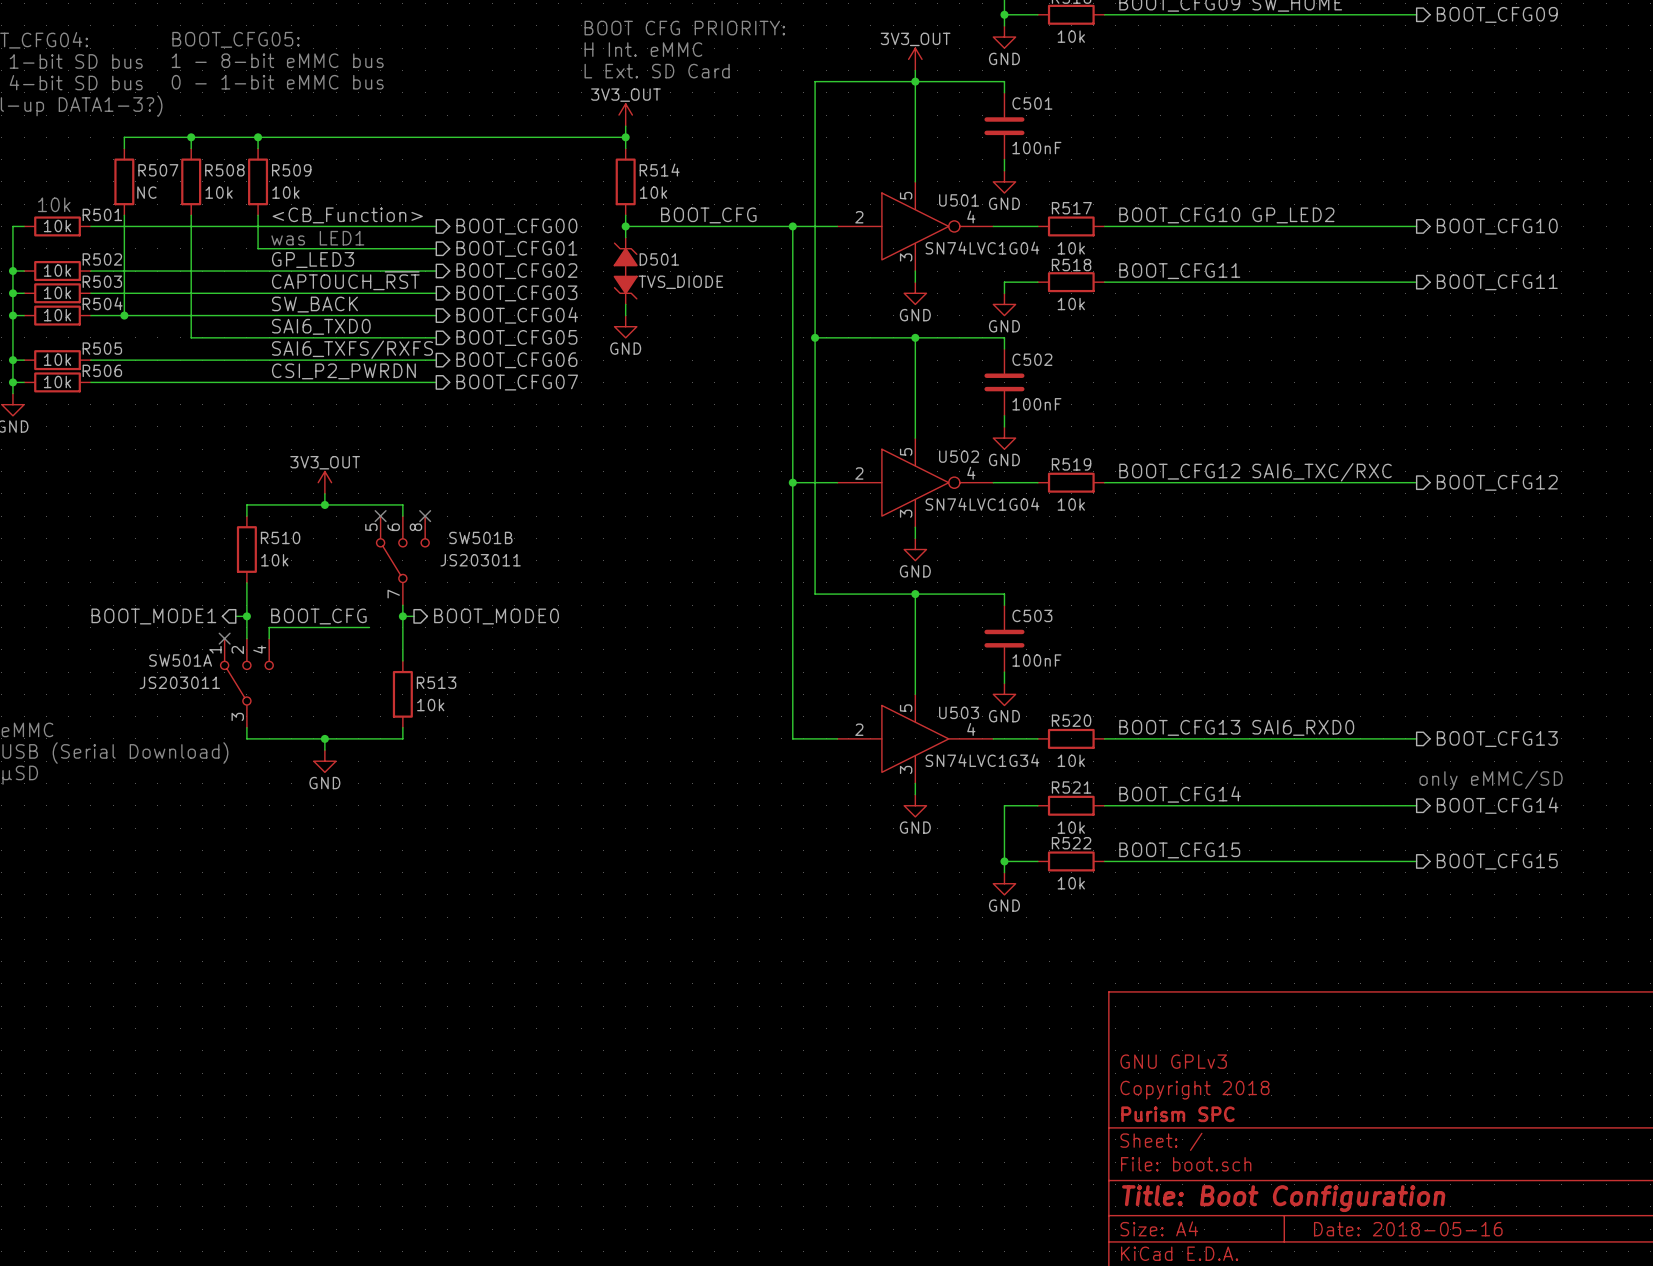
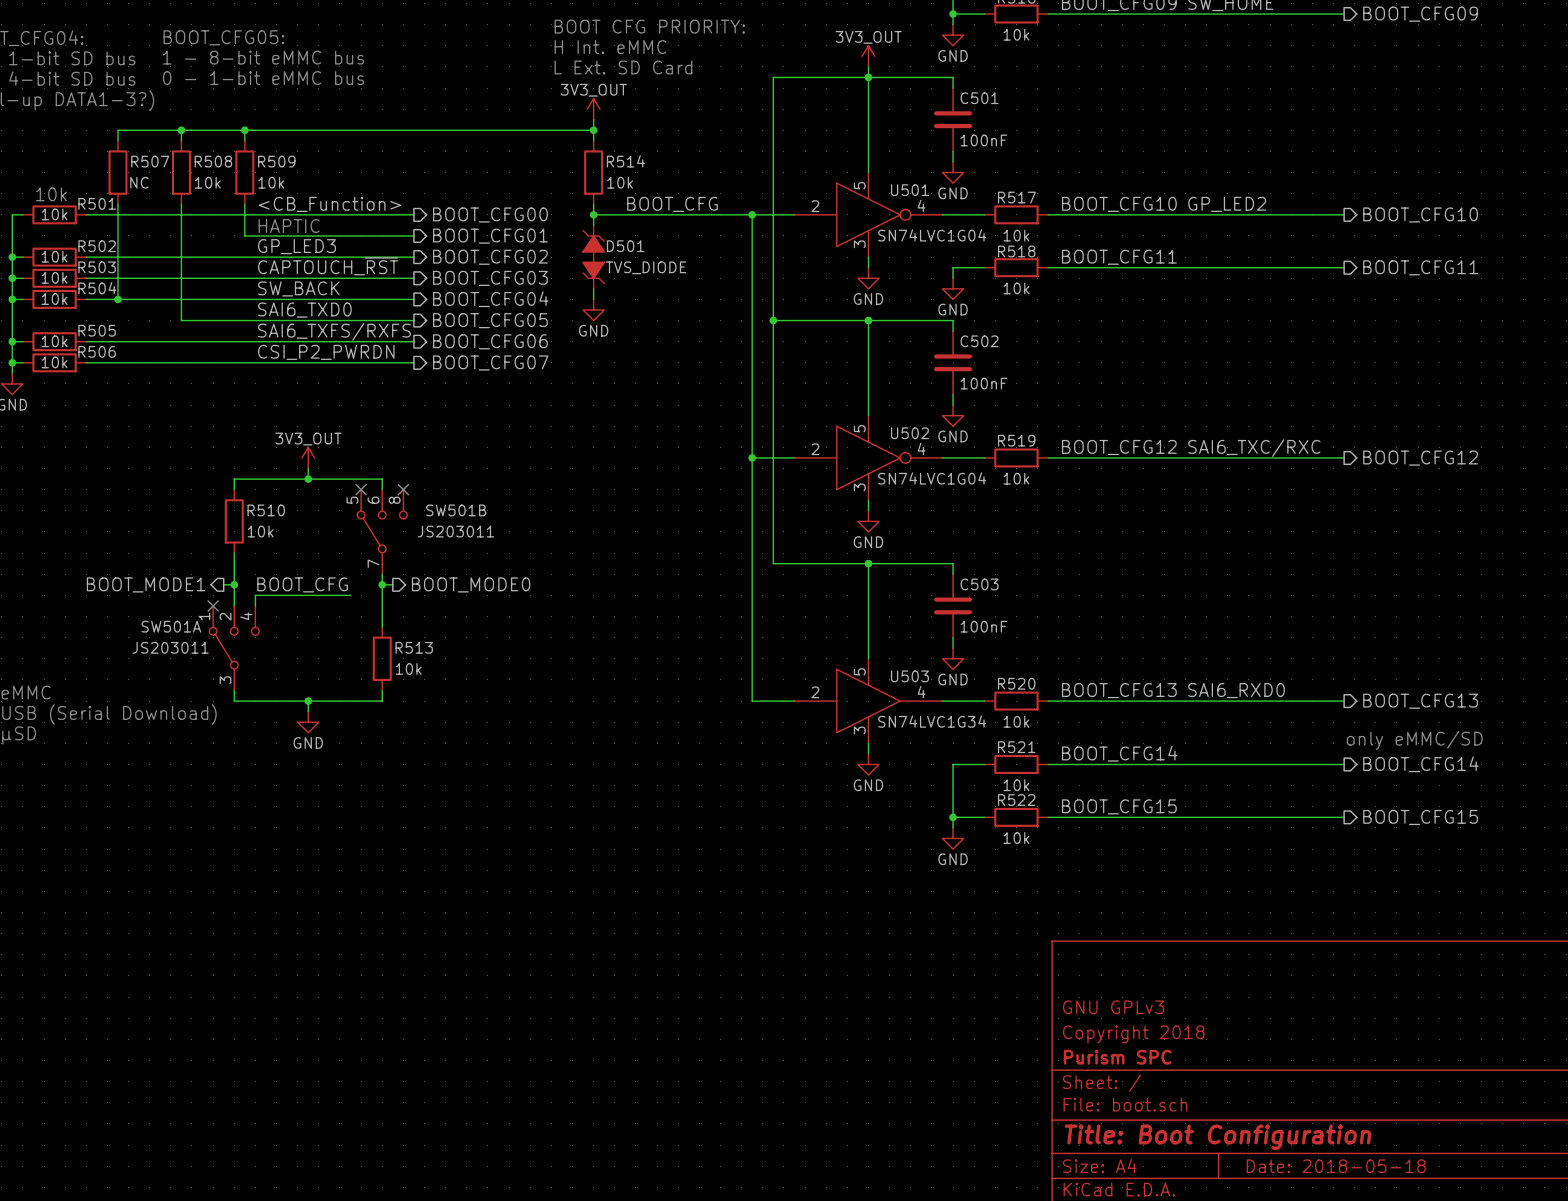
text: was LED1 (317, 238) -> HAPTIC (289, 226)
title block: Date: 2018-05-16 (1408, 1229) -> Date: 2018-05-18 (1336, 1166)

